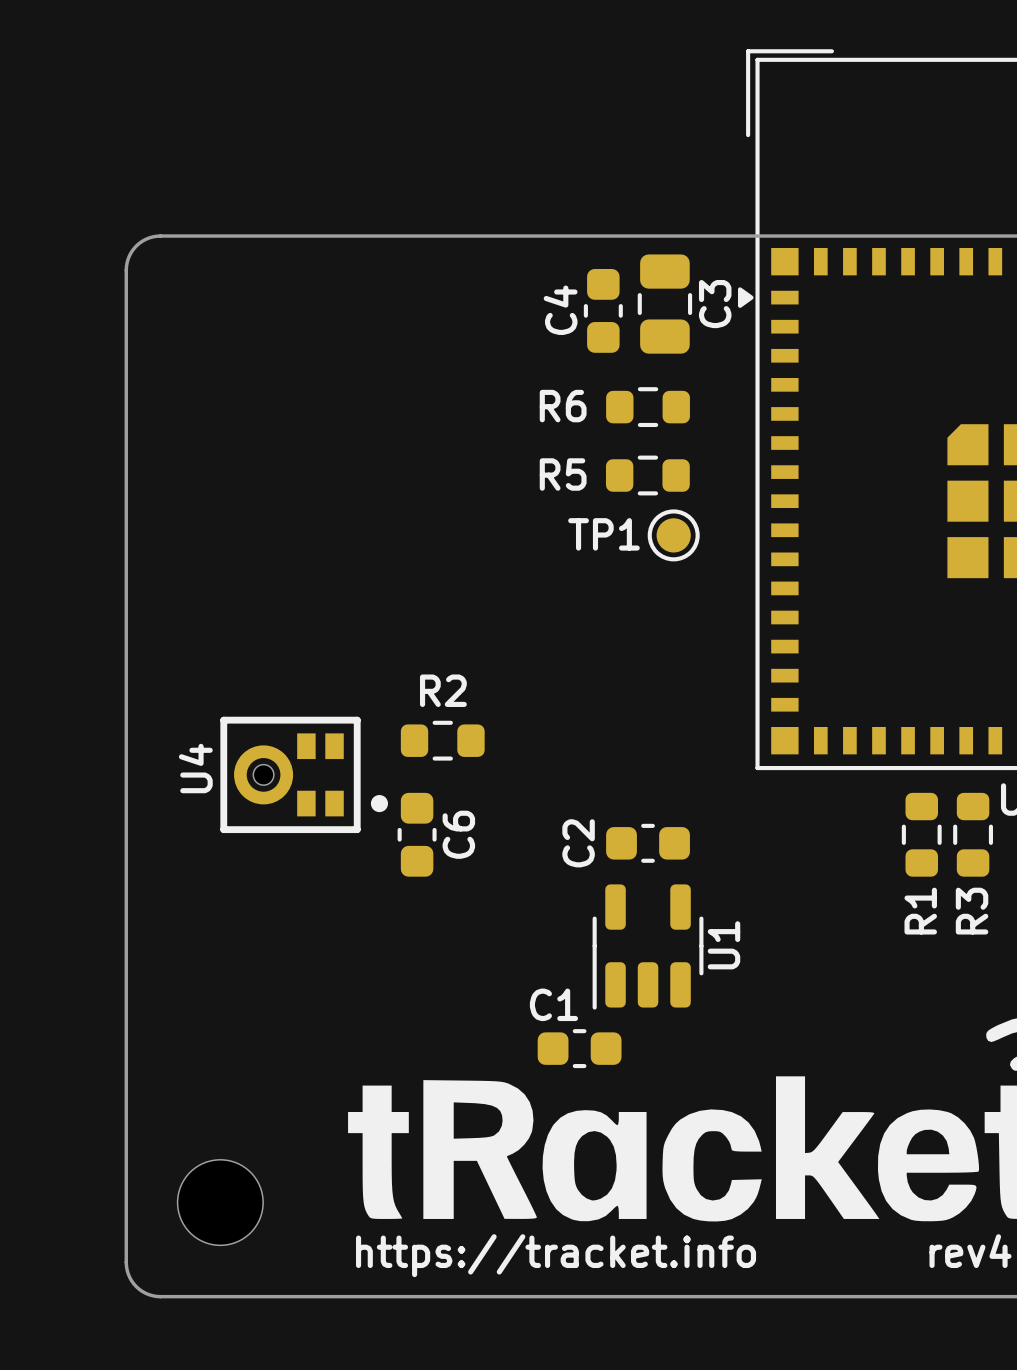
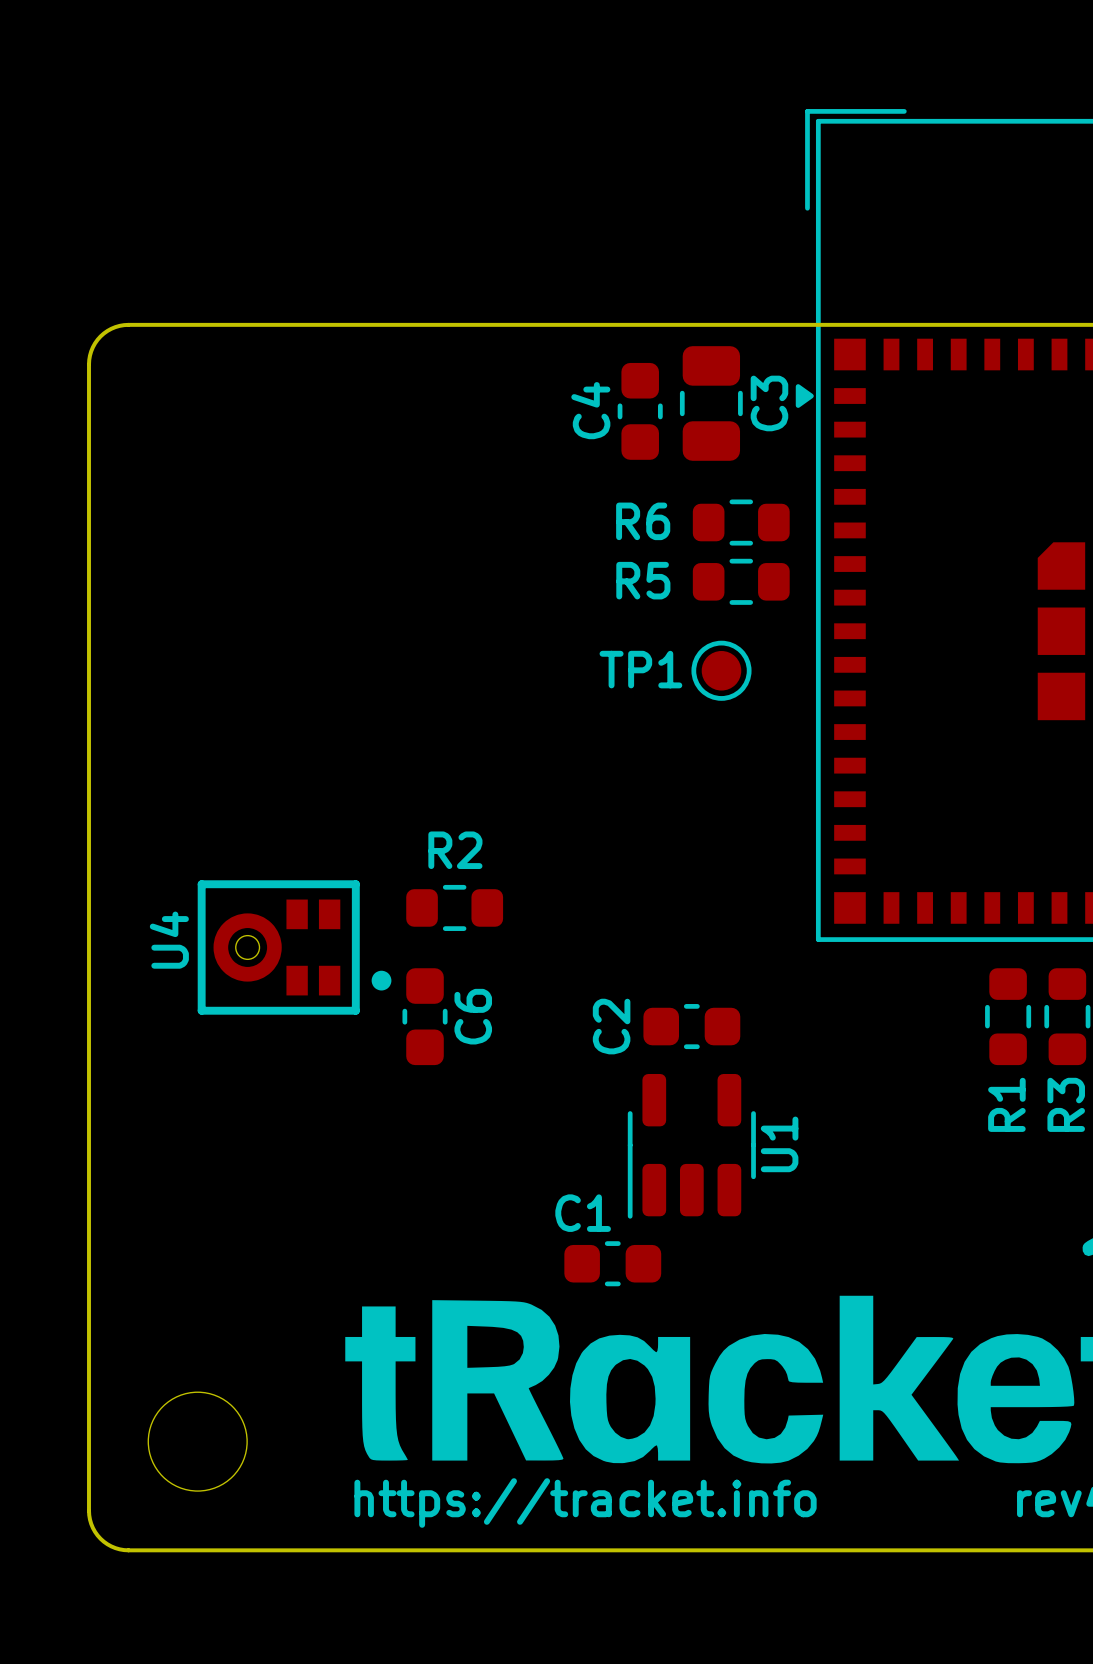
R6 position: (648, 407) -> (741, 522)
R5 position: (647, 475) -> (741, 581)

